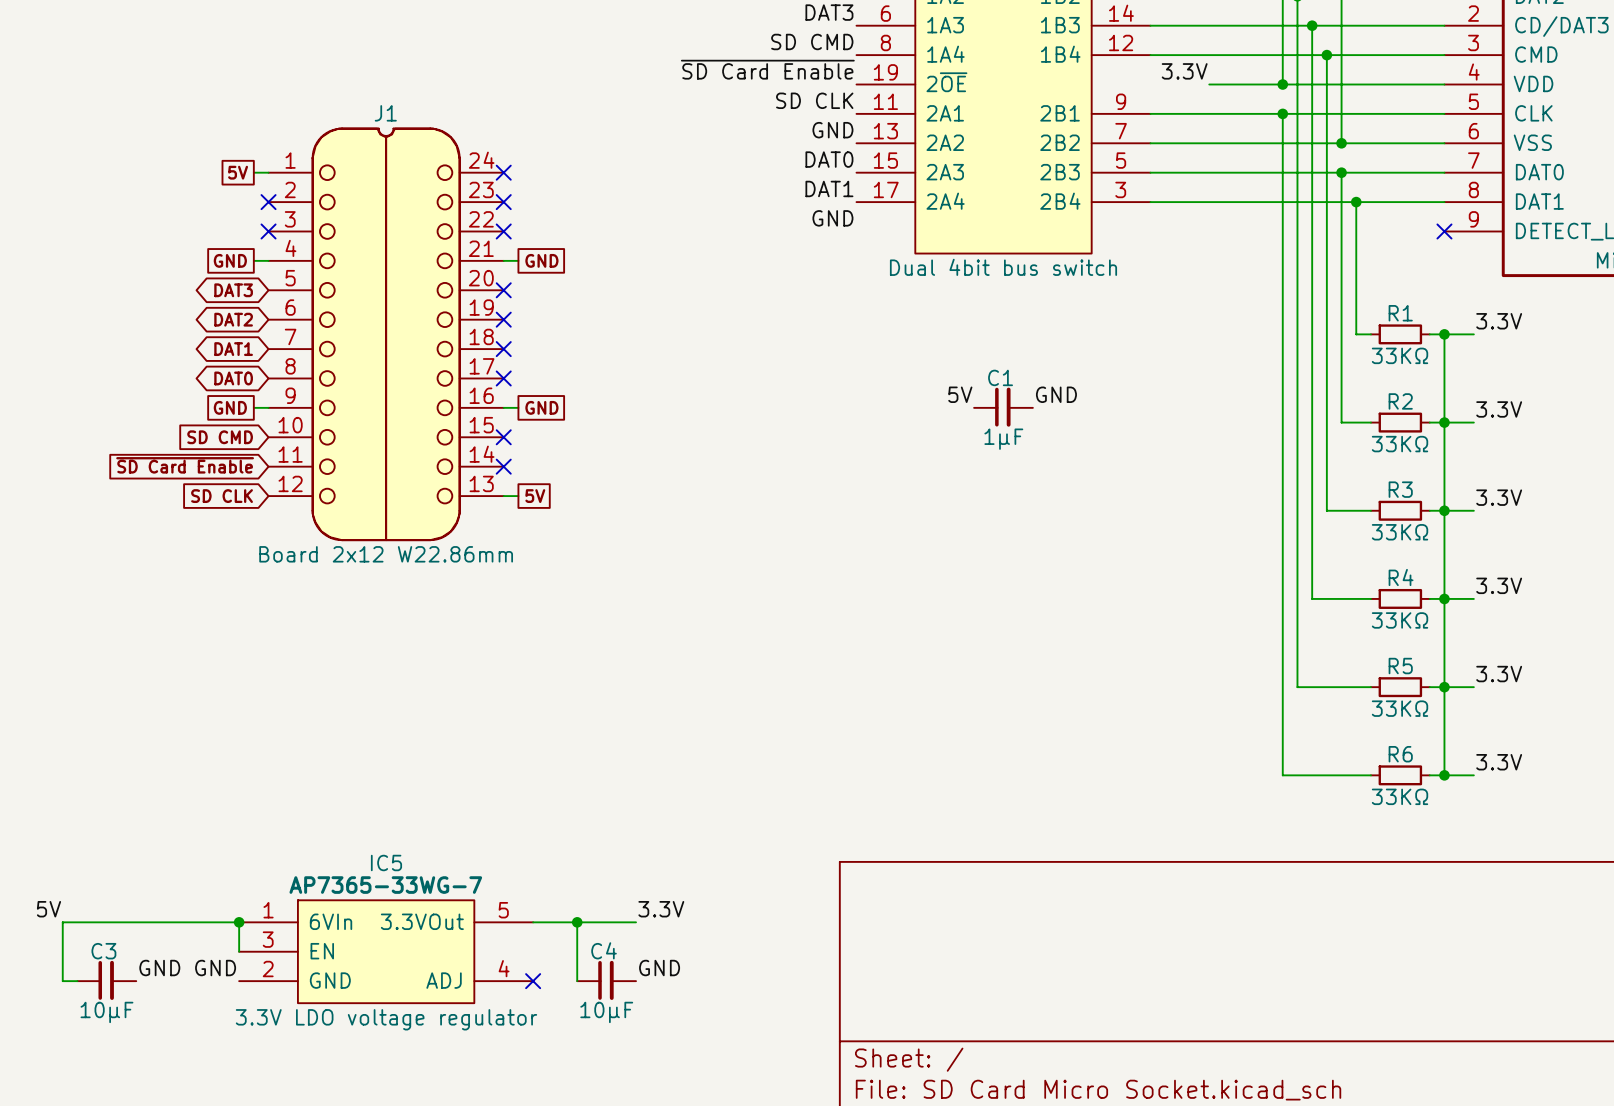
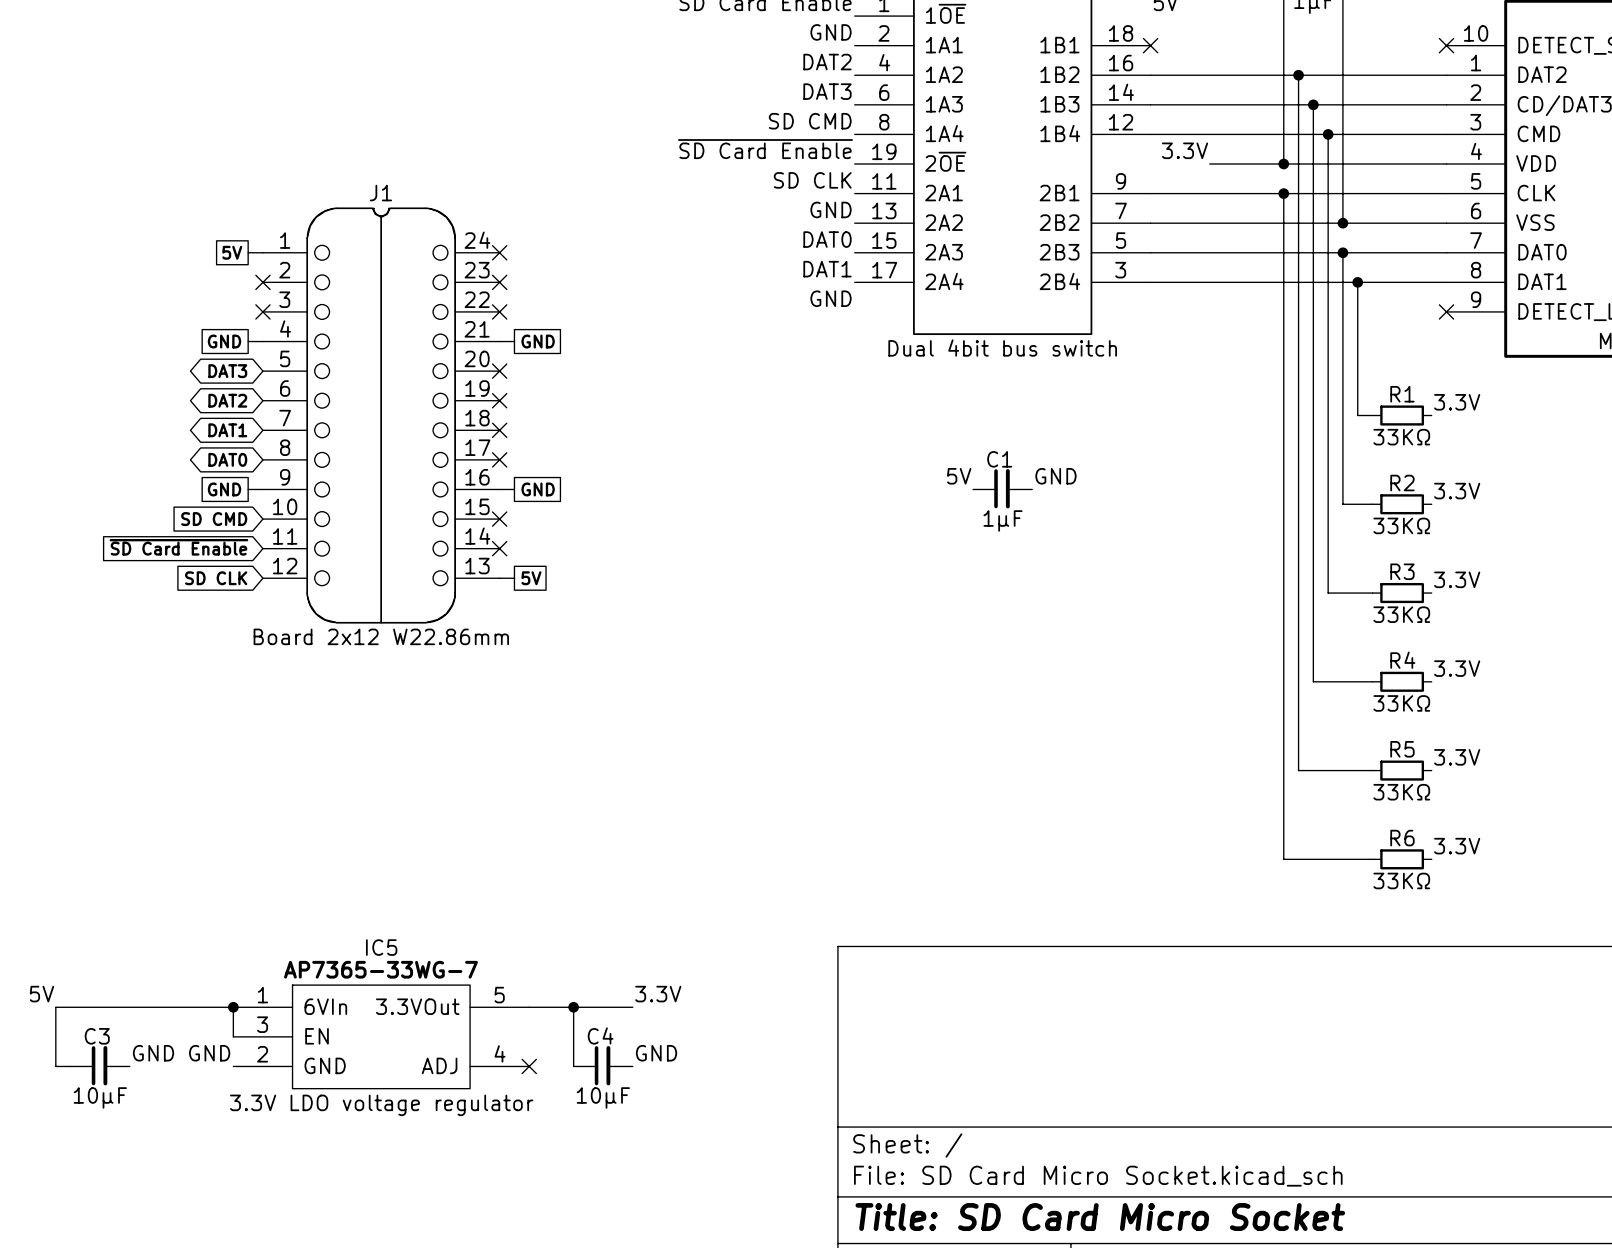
label position: 3.3V (1499, 321) -> 3.3V (1457, 402)
wire: (1429, 334) (1473, 334) -> none
wire: (1444, 334) (1444, 775) -> none
junction: (1444, 334) -> none
label position: 3.3V (1499, 409) -> 3.3V (1457, 491)
wire: (1429, 422) (1473, 422) -> none
junction: (1444, 422) -> none
label position: 3.3V (1499, 497) -> 3.3V (1457, 579)
wire: (1429, 510) (1473, 510) -> none
junction: (1444, 510) -> none
label position: 3.3V (1499, 585) -> 3.3V (1457, 668)
wire: (1429, 598) (1473, 598) -> none
junction: (1444, 598) -> none
label position: 3.3V (1499, 674) -> 3.3V (1457, 757)
wire: (1429, 687) (1473, 687) -> none
junction: (1444, 687) -> none
label position: 3.3V (1499, 762) -> 3.3V (1457, 846)
wire: (1429, 775) (1473, 775) -> none
junction: (1444, 775) -> none

